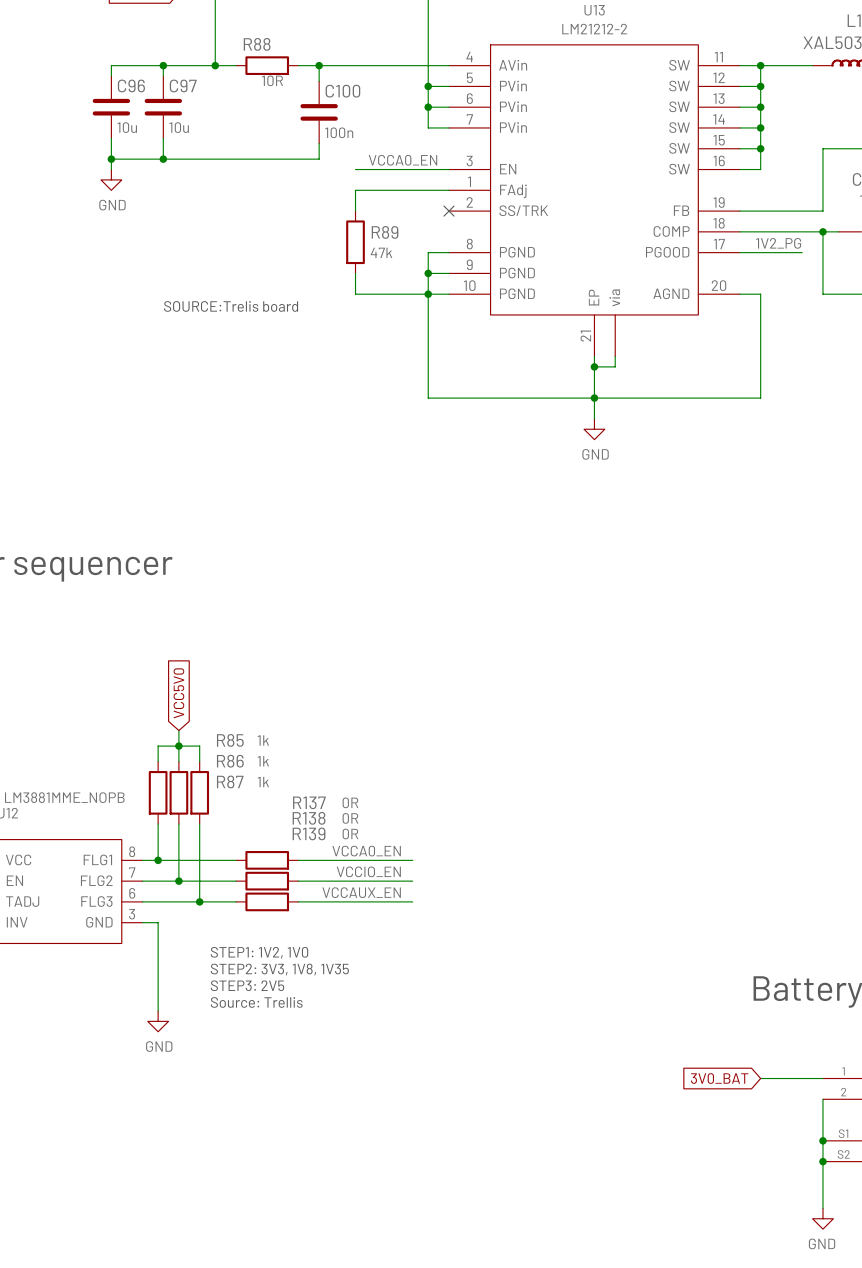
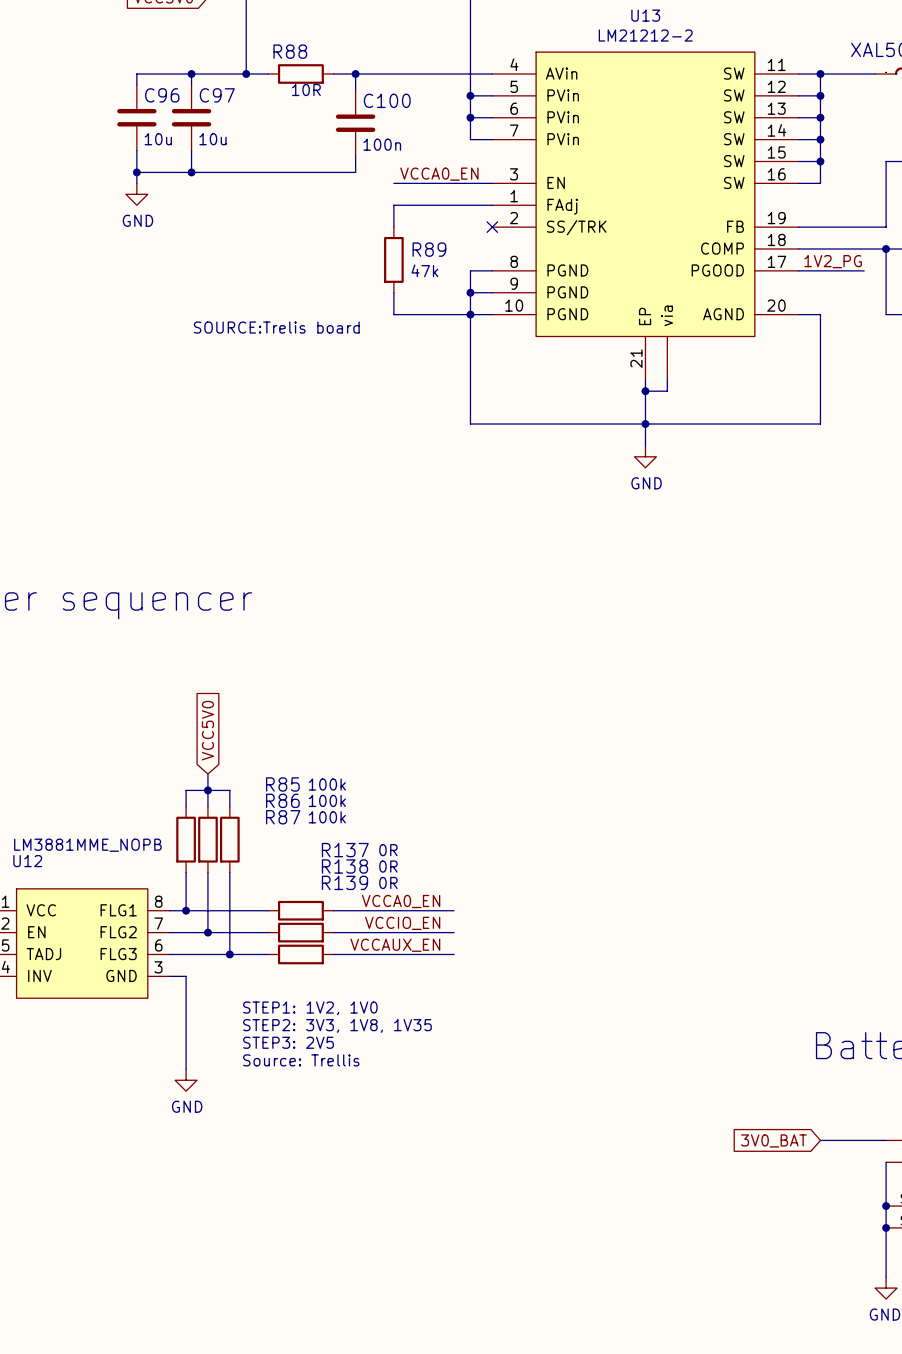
R85 name position: R85 (230, 740) -> R85 (282, 784)
R85 text: 1k (263, 740) -> 100k (327, 784)
R86 name position: R86 (230, 761) -> R86 (282, 800)
R86 text: 1k (263, 761) -> 100k (327, 800)
R87 name position: R87 (230, 781) -> R87 (283, 817)
R87 text: 1k (263, 782) -> 100k (327, 817)

